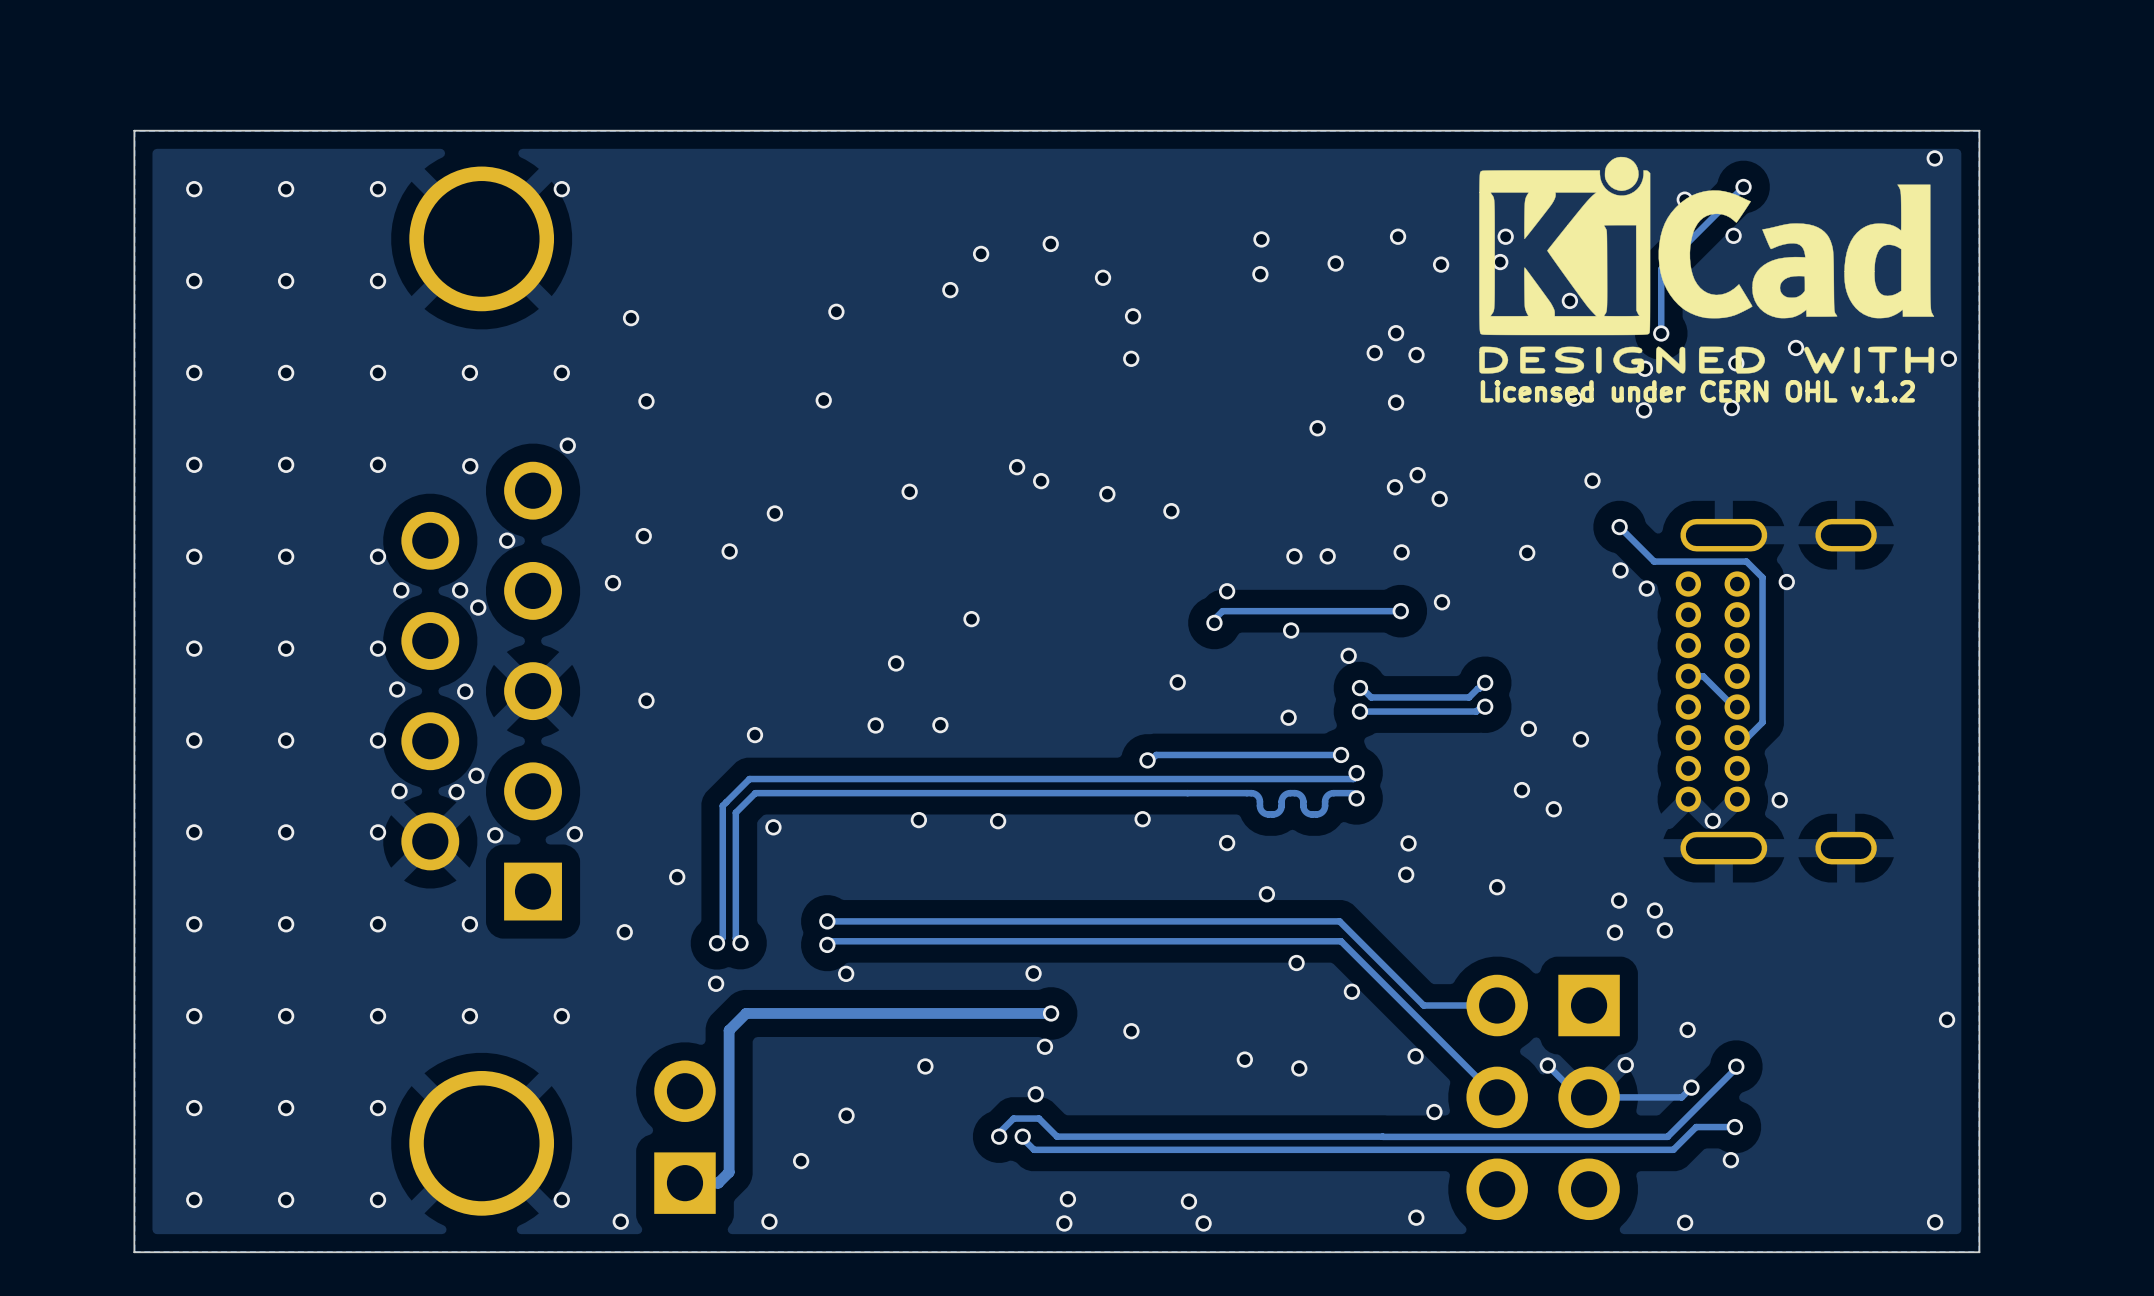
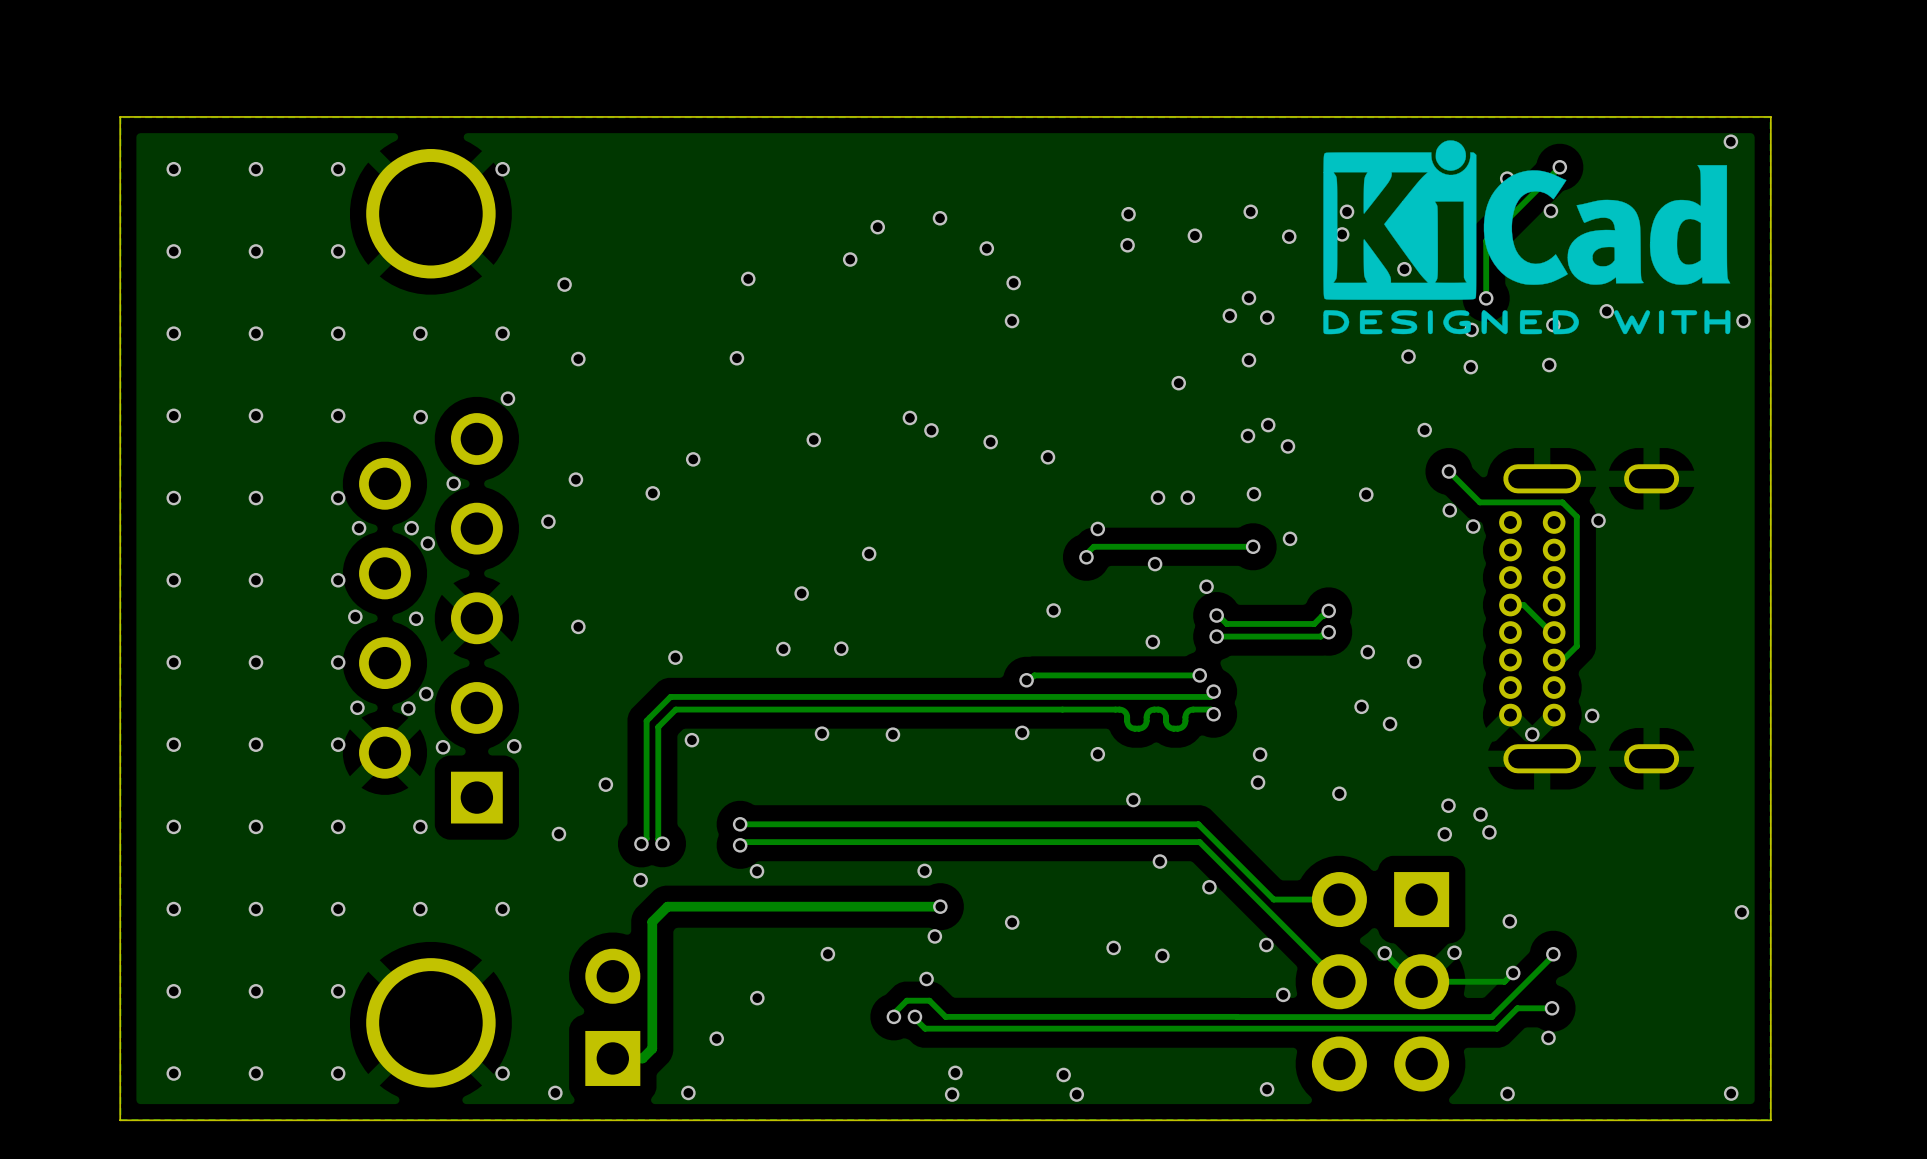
text: Licensed under CERN OHL v.1.2 (1697, 391) -> none

